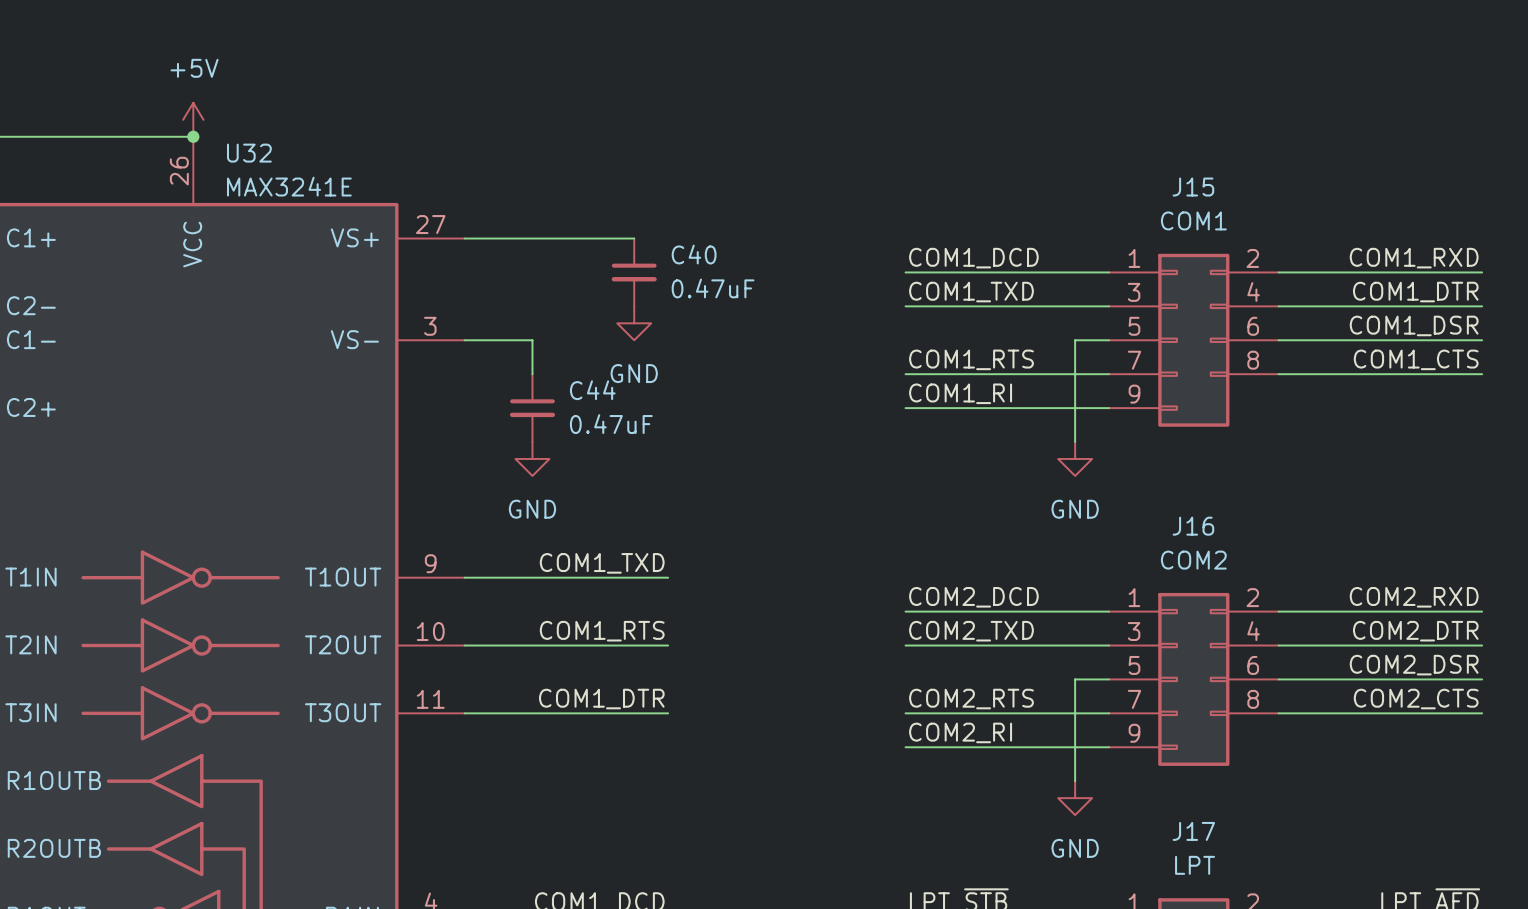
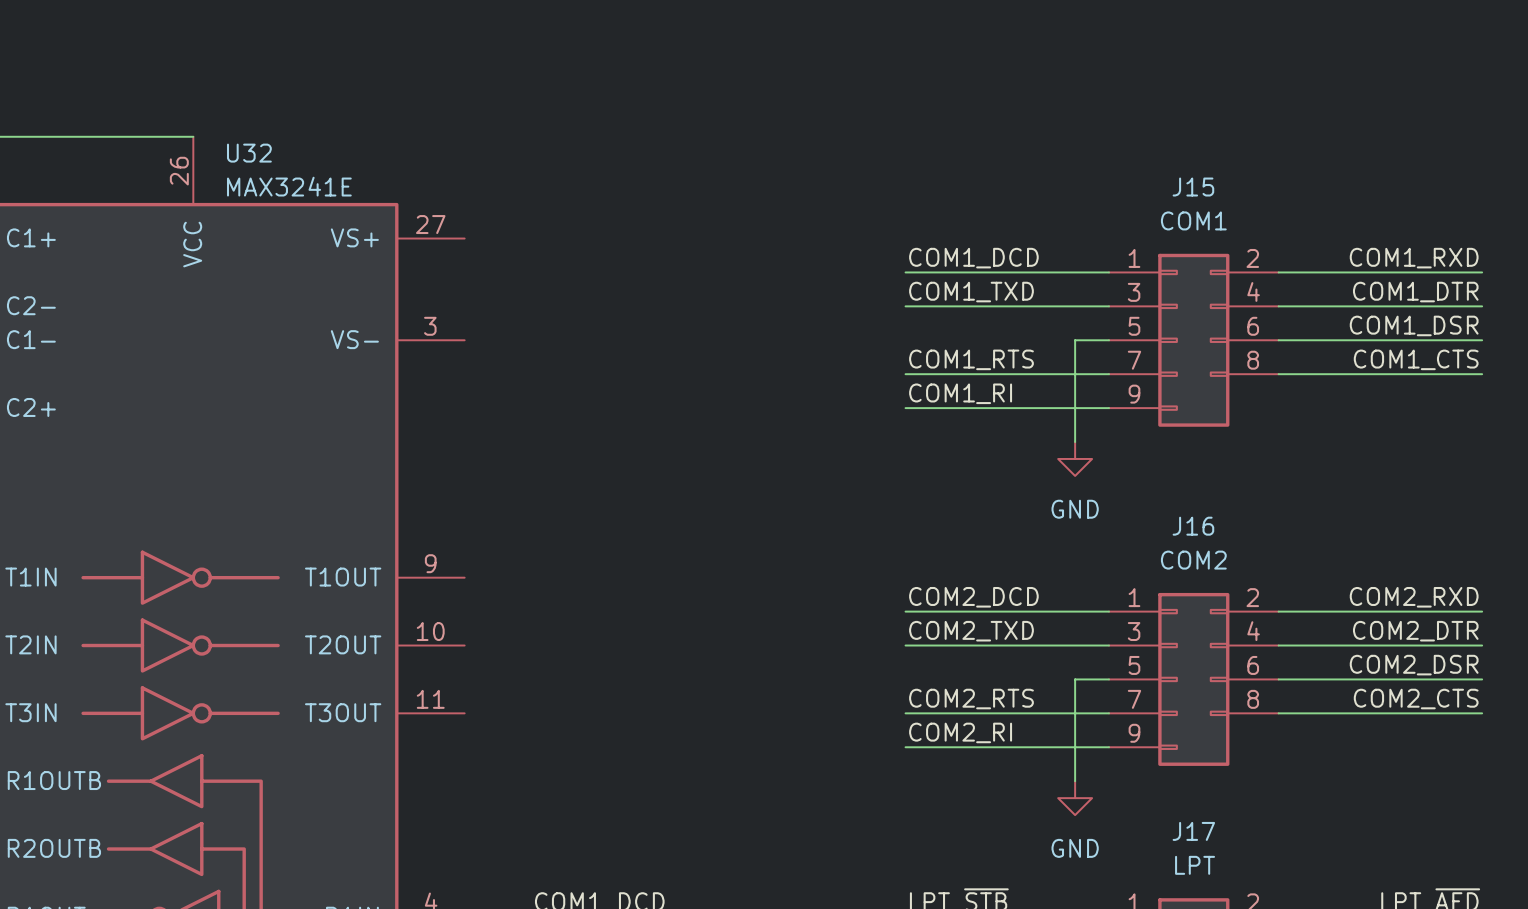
power symbol: +5V (193, 119) -> none
junction: (193, 136) -> none
wire: (464, 238) (634, 238) -> none
C40: 0.47uF (634, 272) -> none
power symbol: GND (634, 323) -> none
wire: (464, 340) (532, 340) (532, 374) -> none
C44: 0.47uF (532, 408) -> none
power symbol: GND (532, 458) -> none
label: COM1_TXD (602, 563) -> none
wire: (464, 577) (668, 577) -> none
label: COM1_RTS (602, 631) -> none
wire: (464, 645) (668, 645) -> none
label: COM1_DTR (601, 699) -> none
wire: (464, 713) (668, 713) -> none

